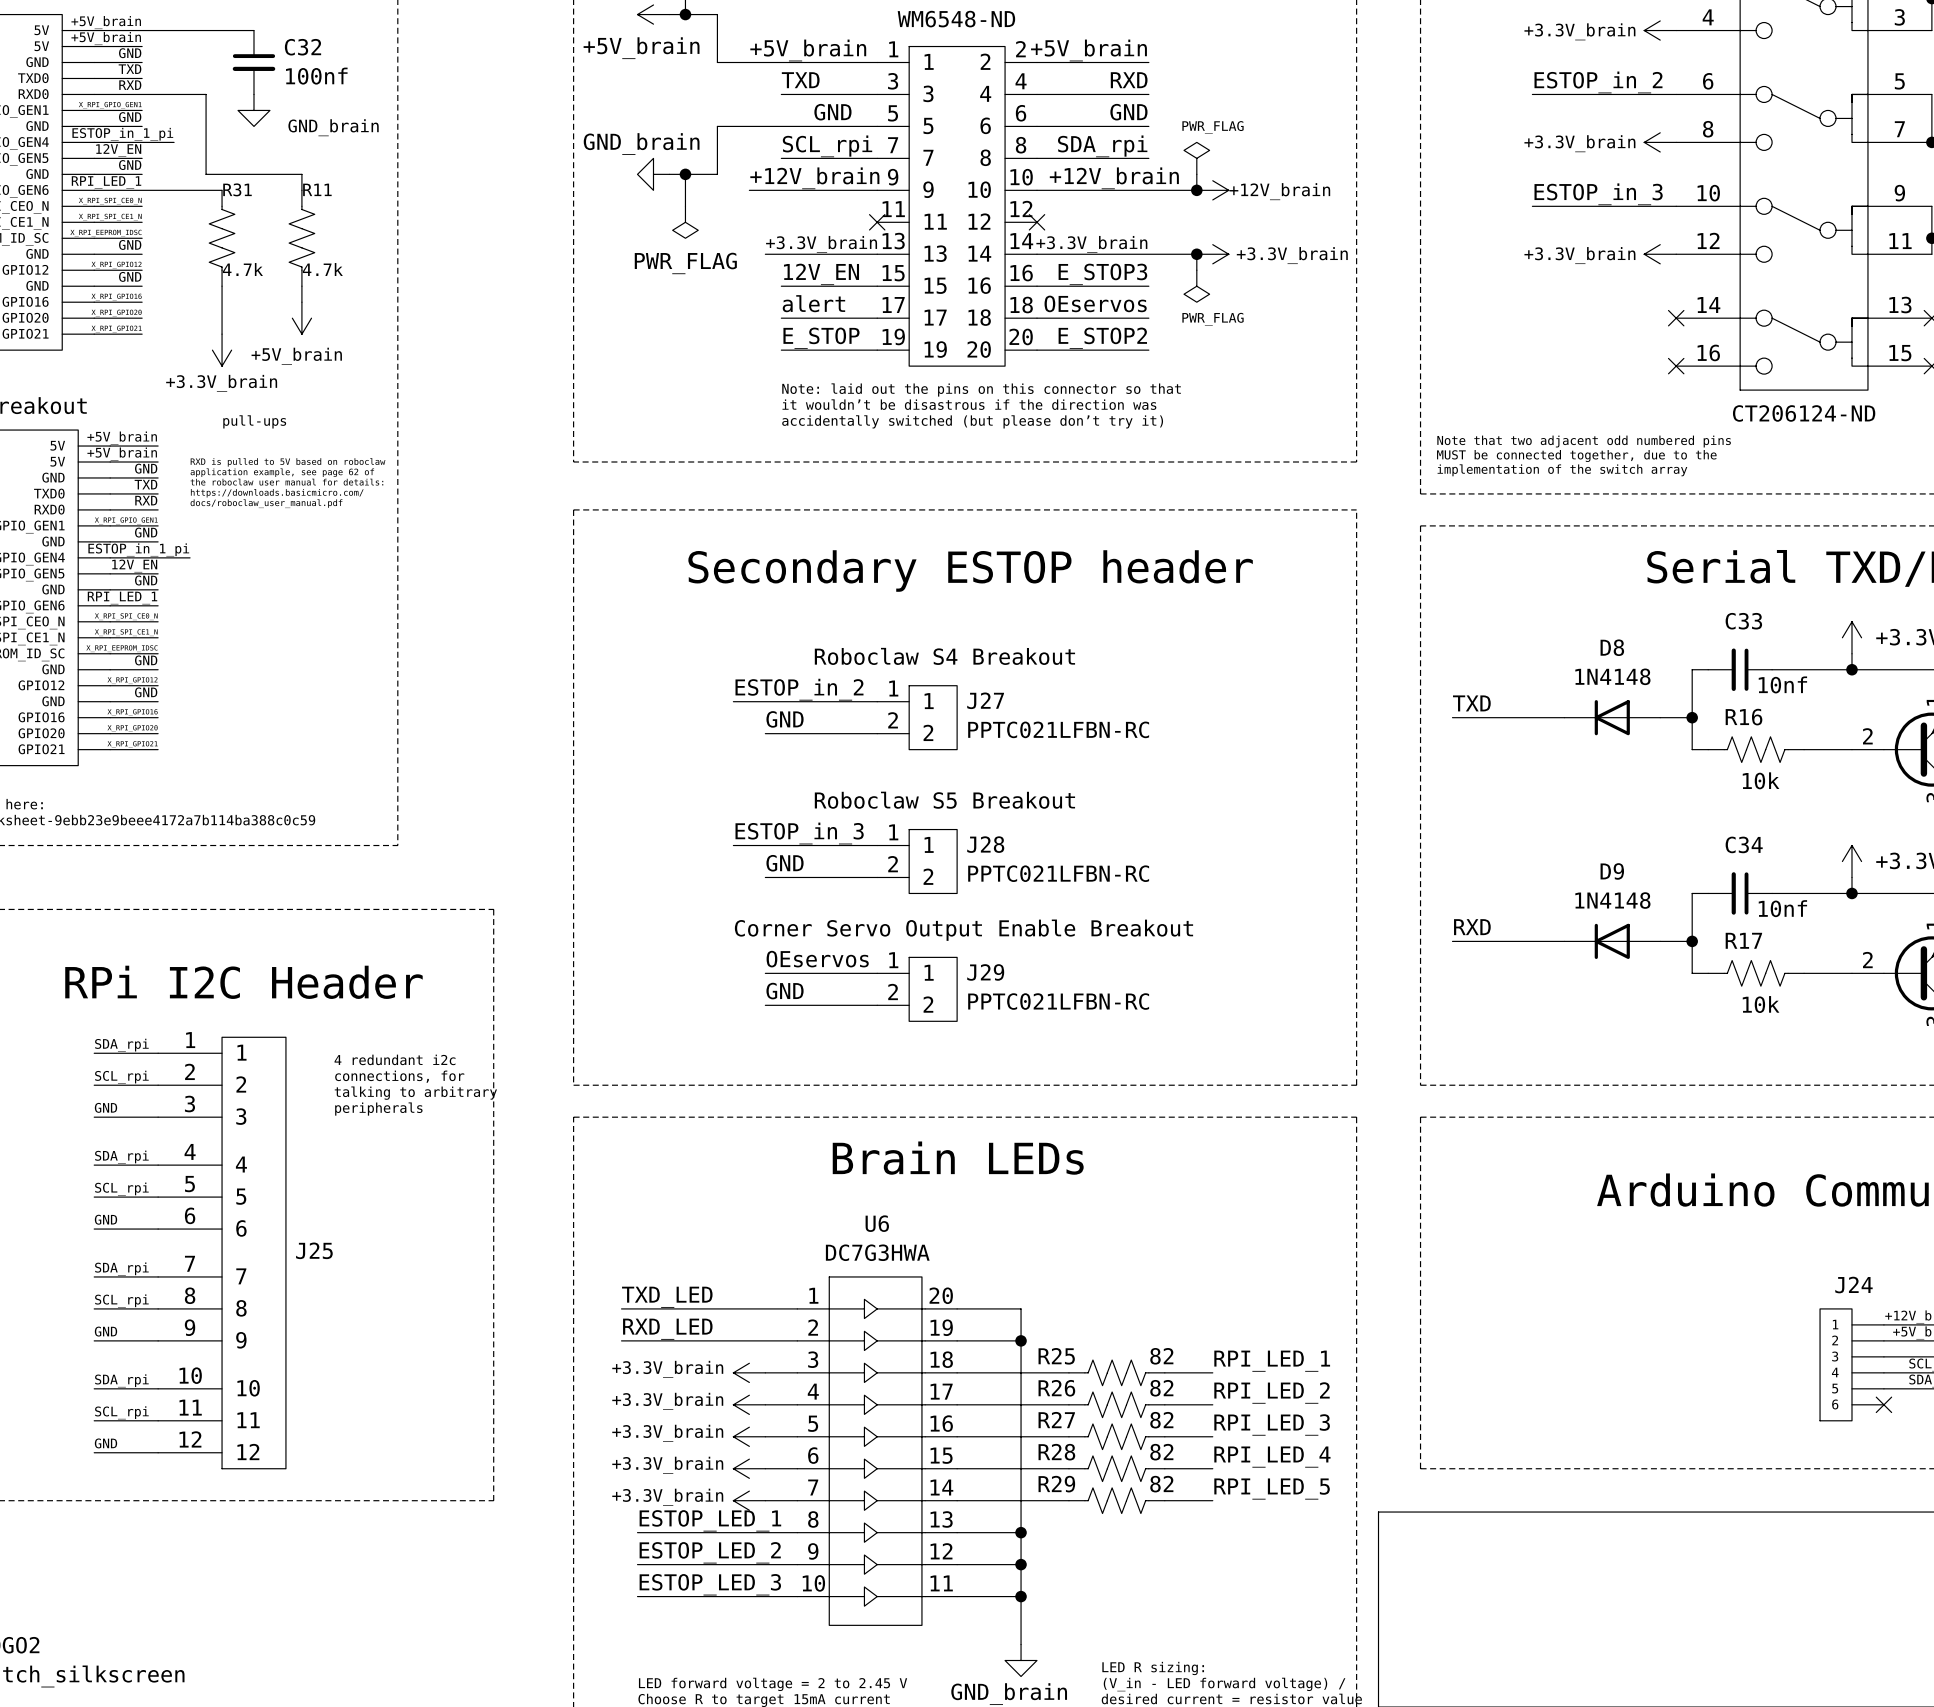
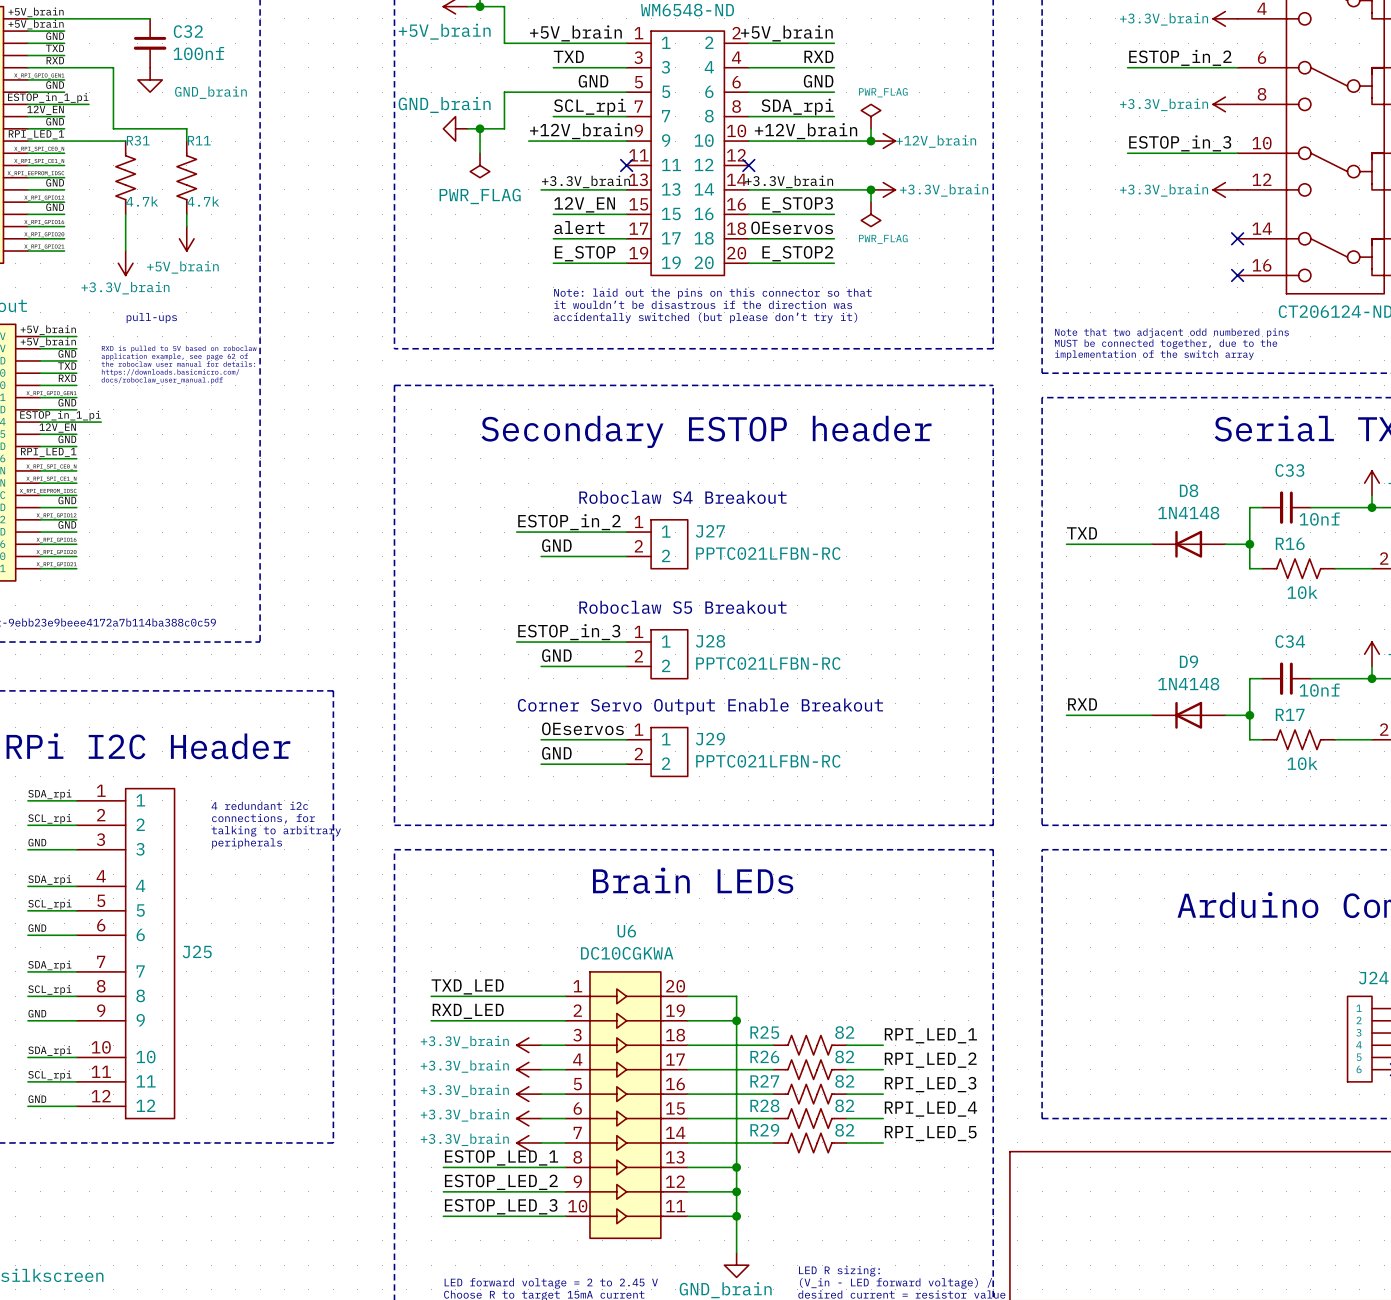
U6 value: DC7G3HWA (877, 1252) -> DC10CGKWA (627, 953)

